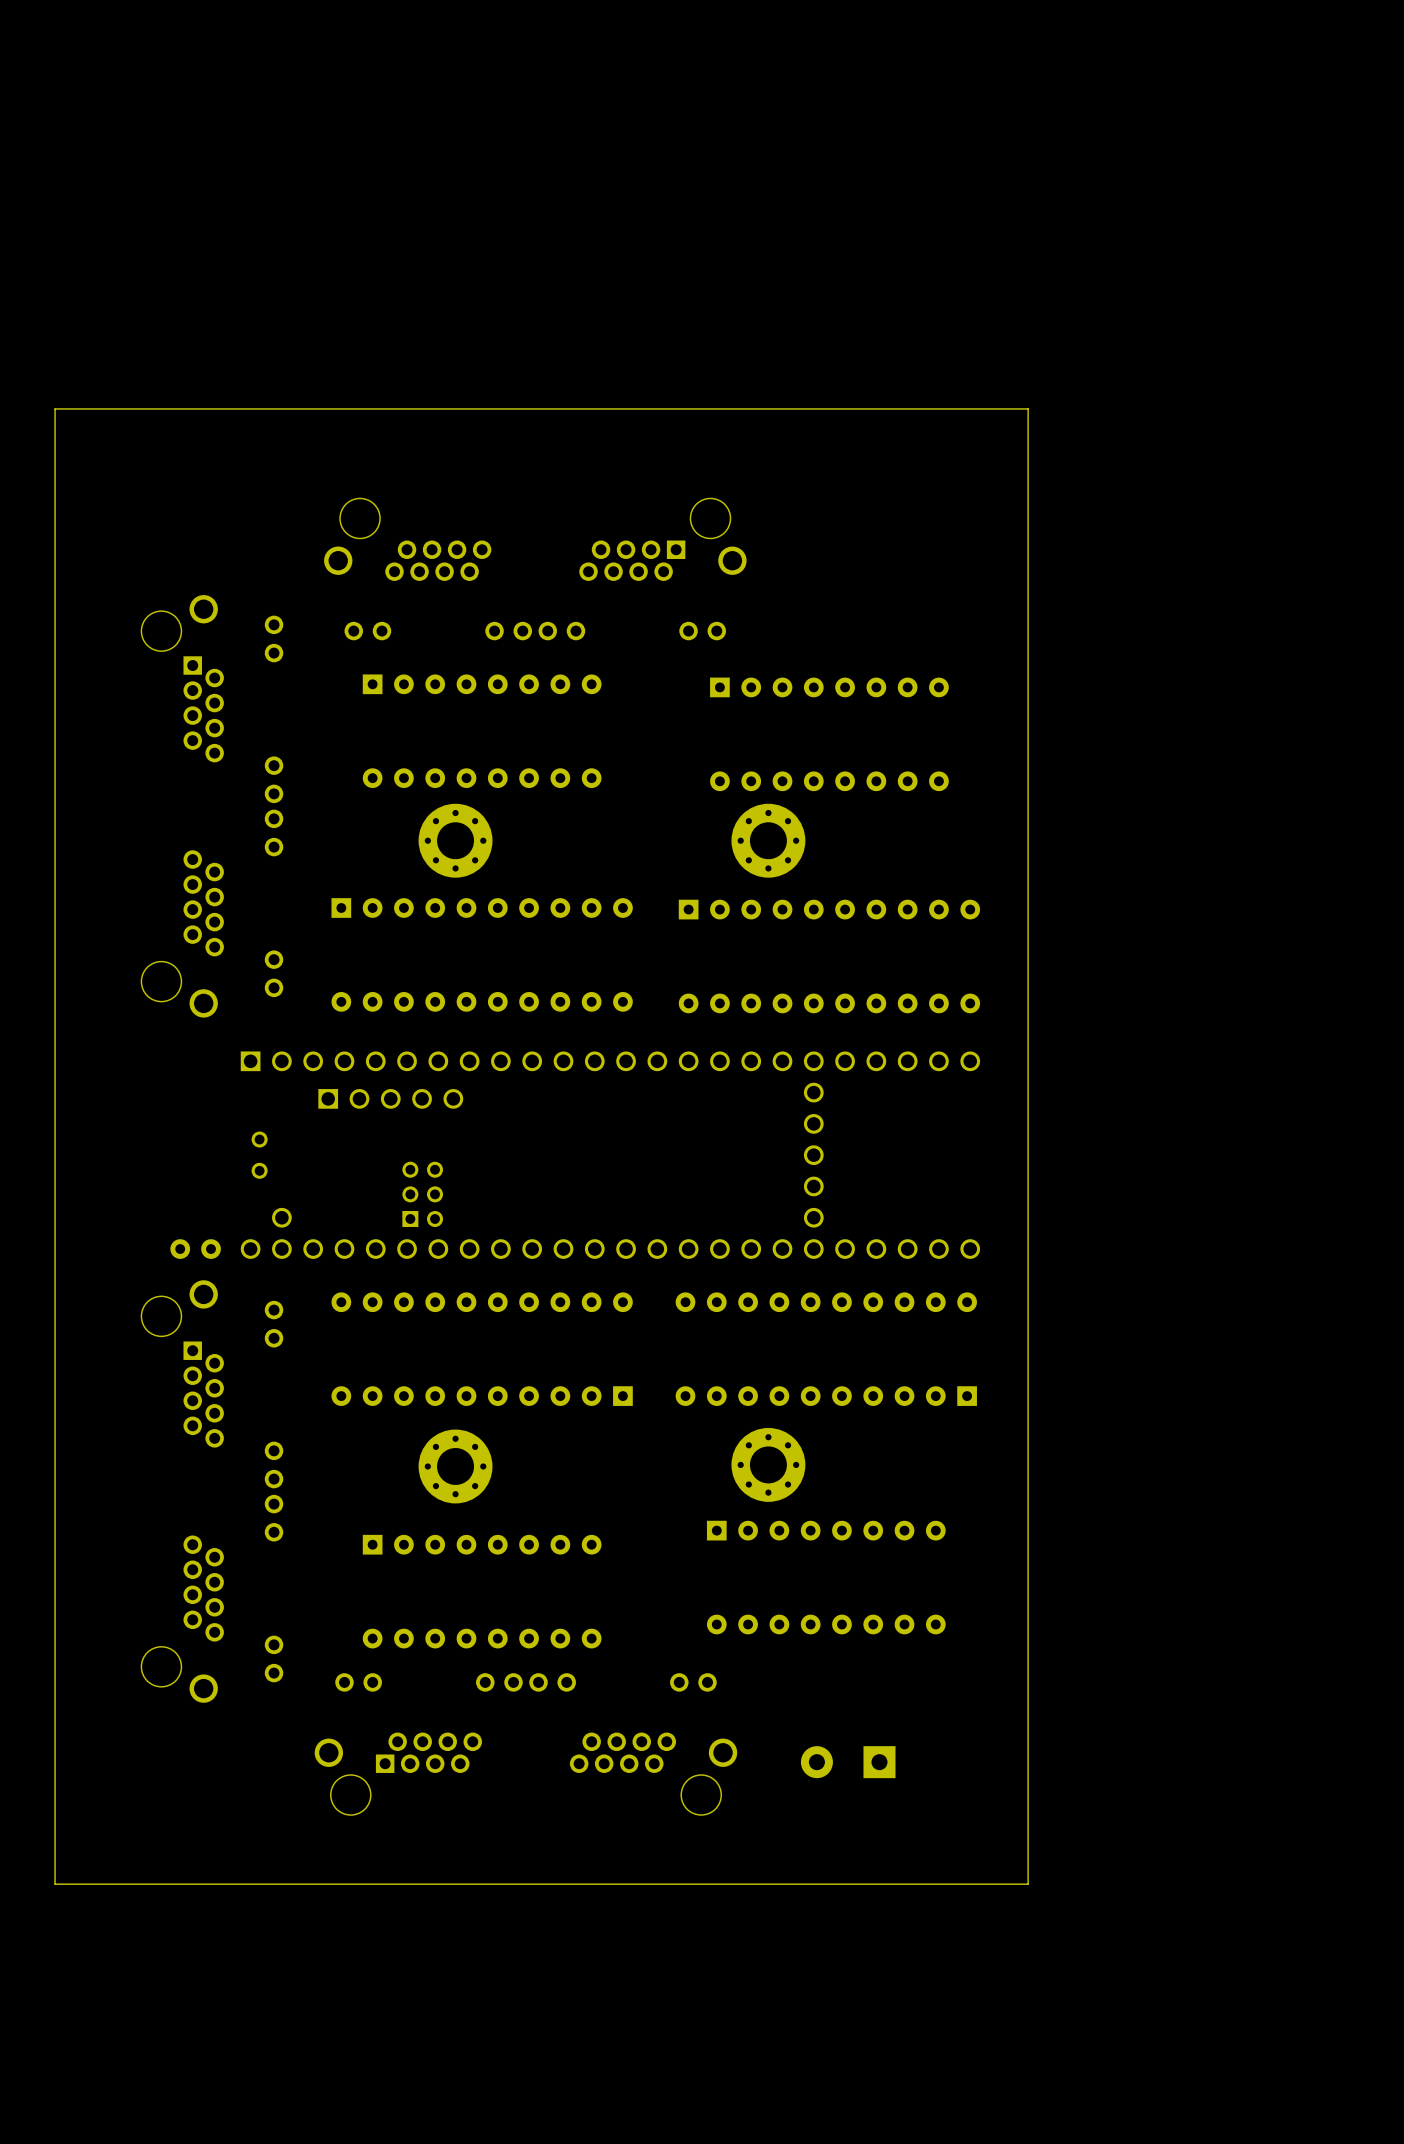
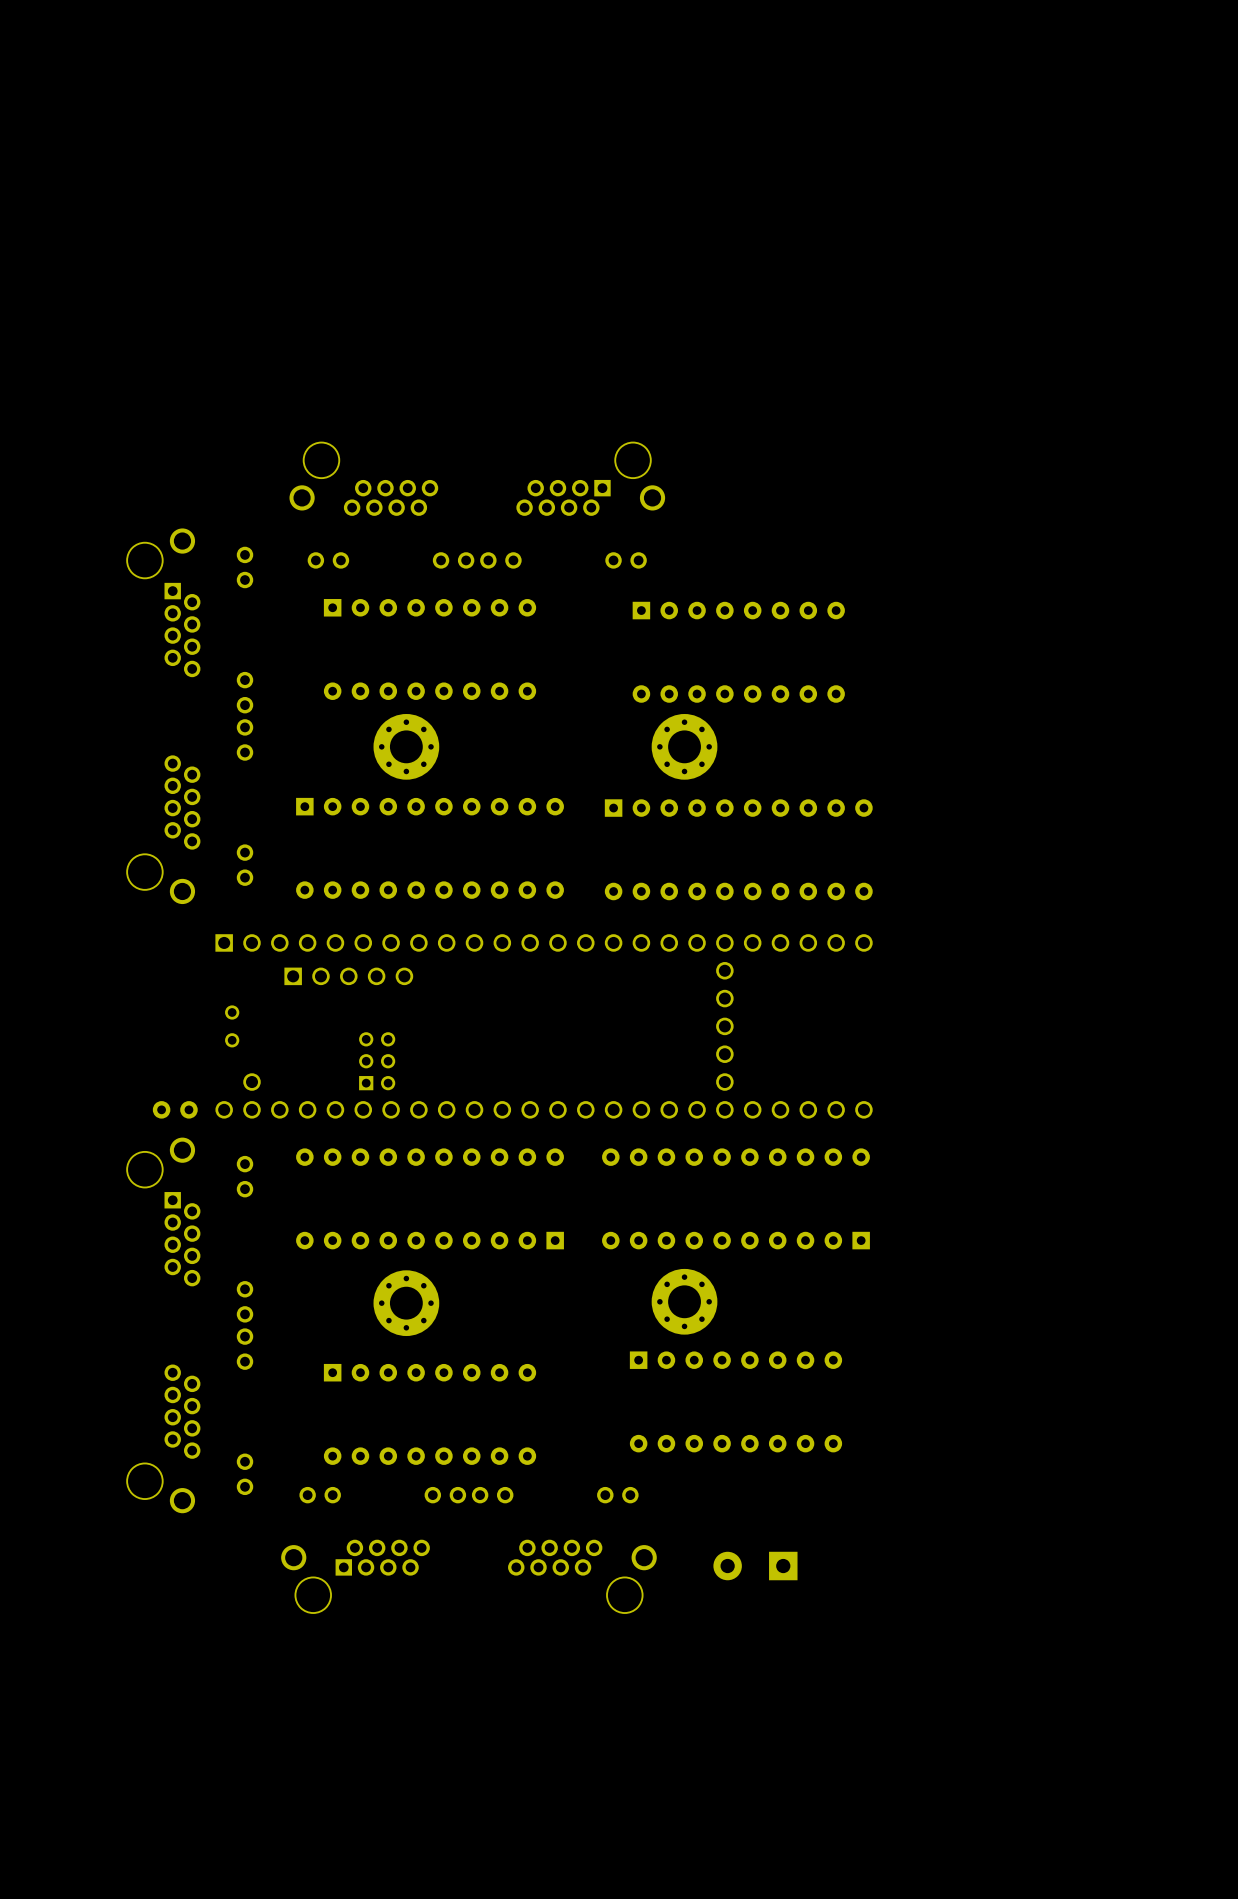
board edge: (1028, 408) (1028, 1884) (55, 1884) (55, 408) (1028, 408) -> none

